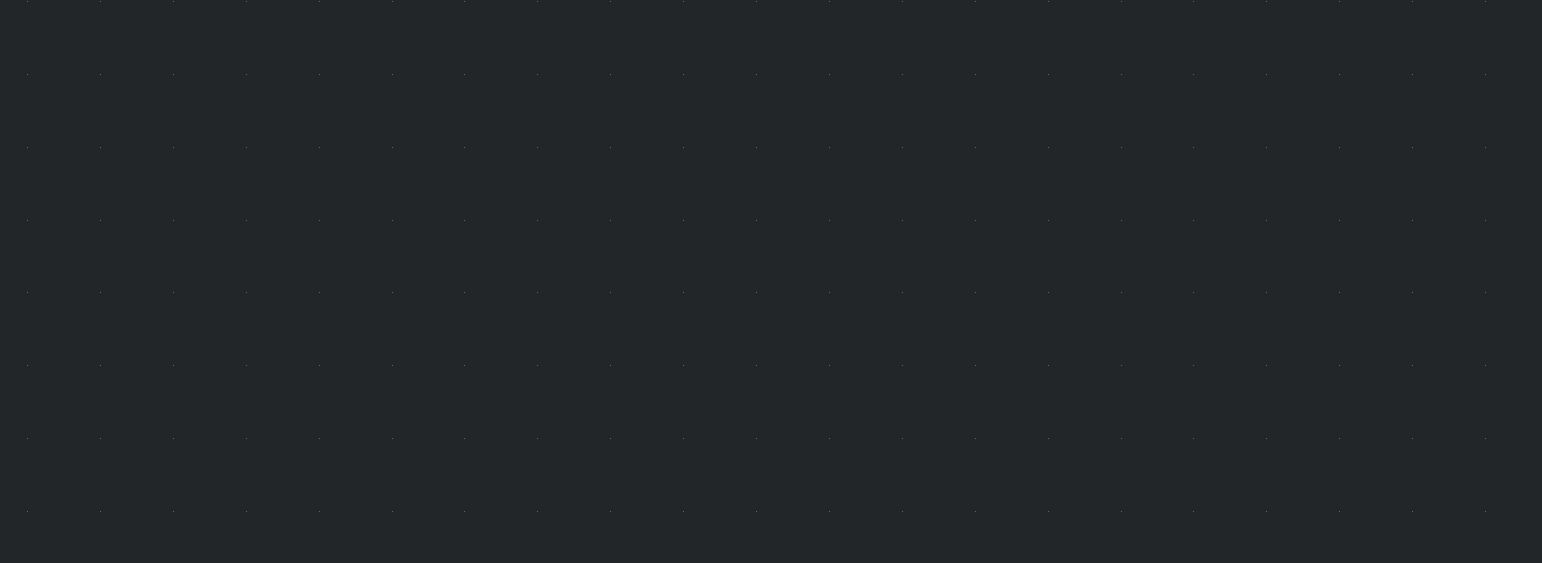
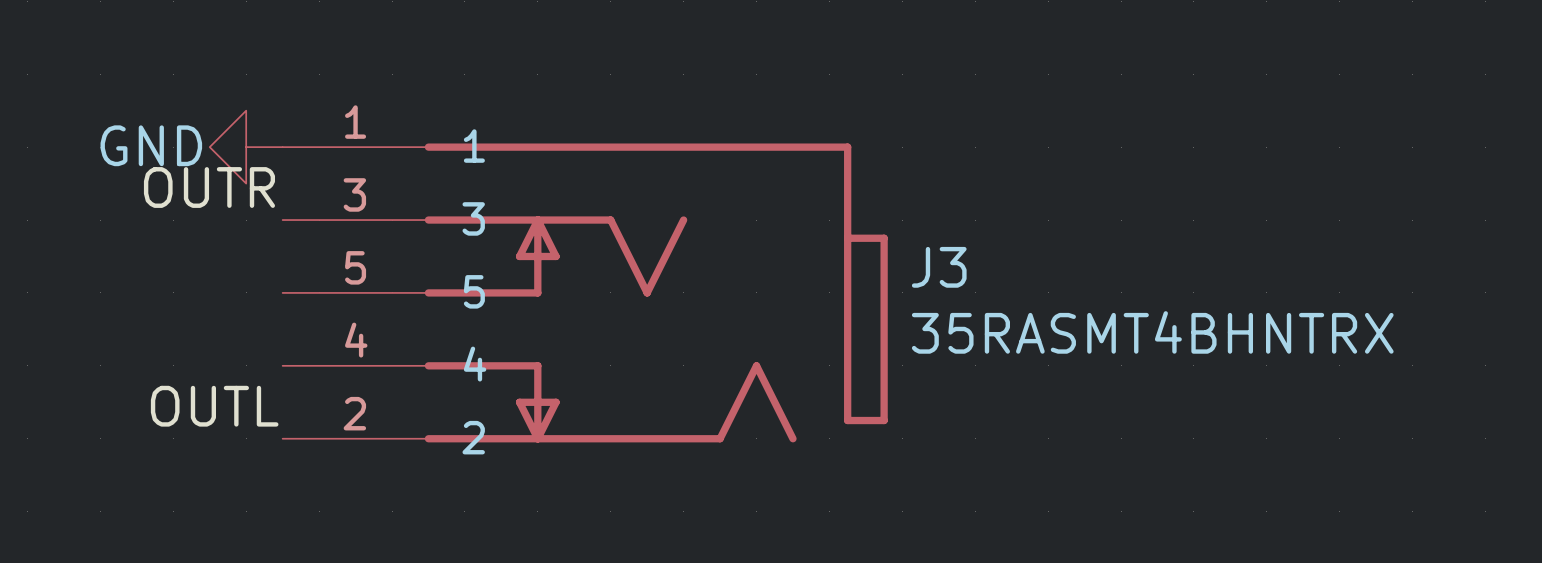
power symbol: none -> GND (246, 147)
label: none -> OUTR (209, 187)
J3: none -> 35RASMT4BHNTRX (585, 292)
label: none -> OUTL (214, 406)

